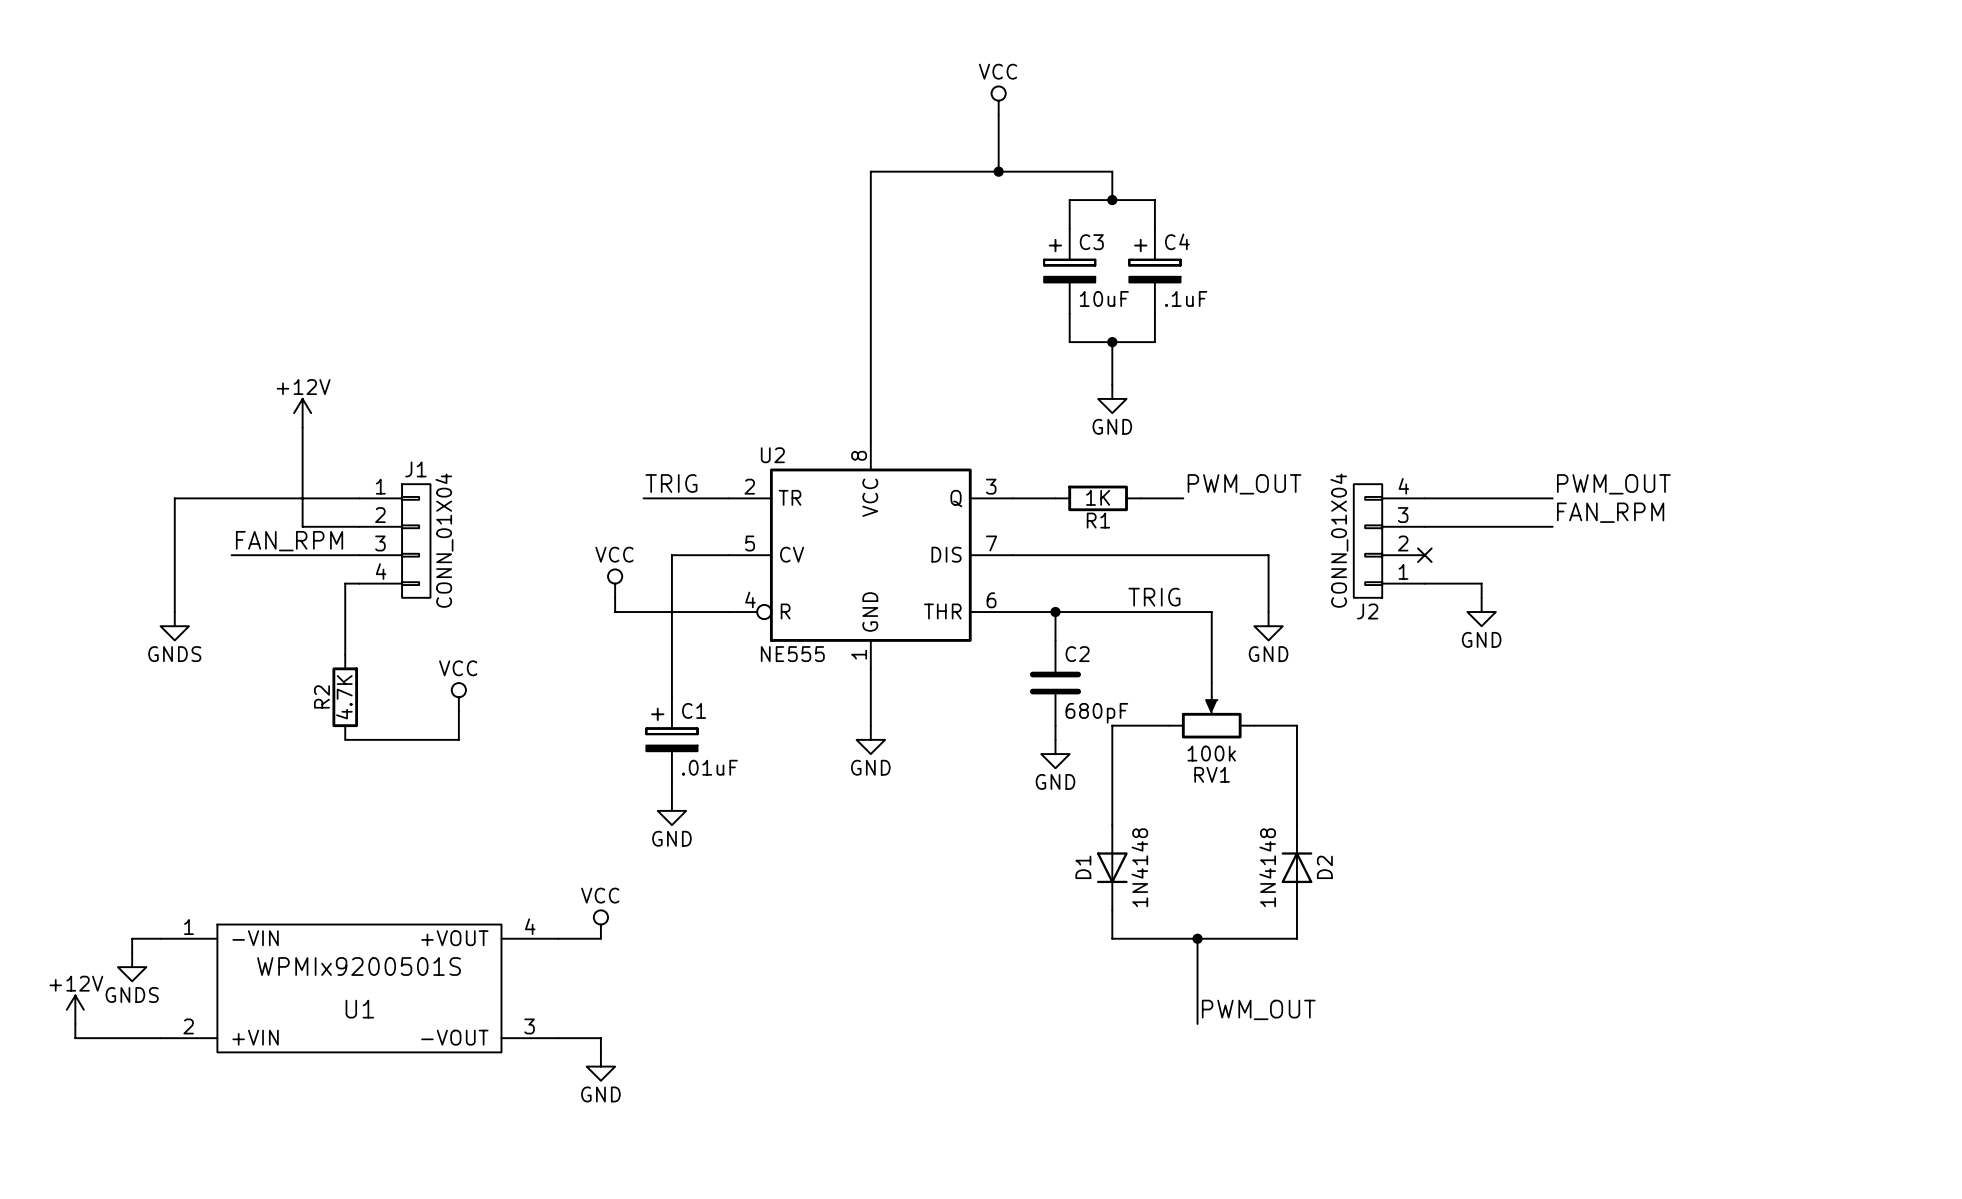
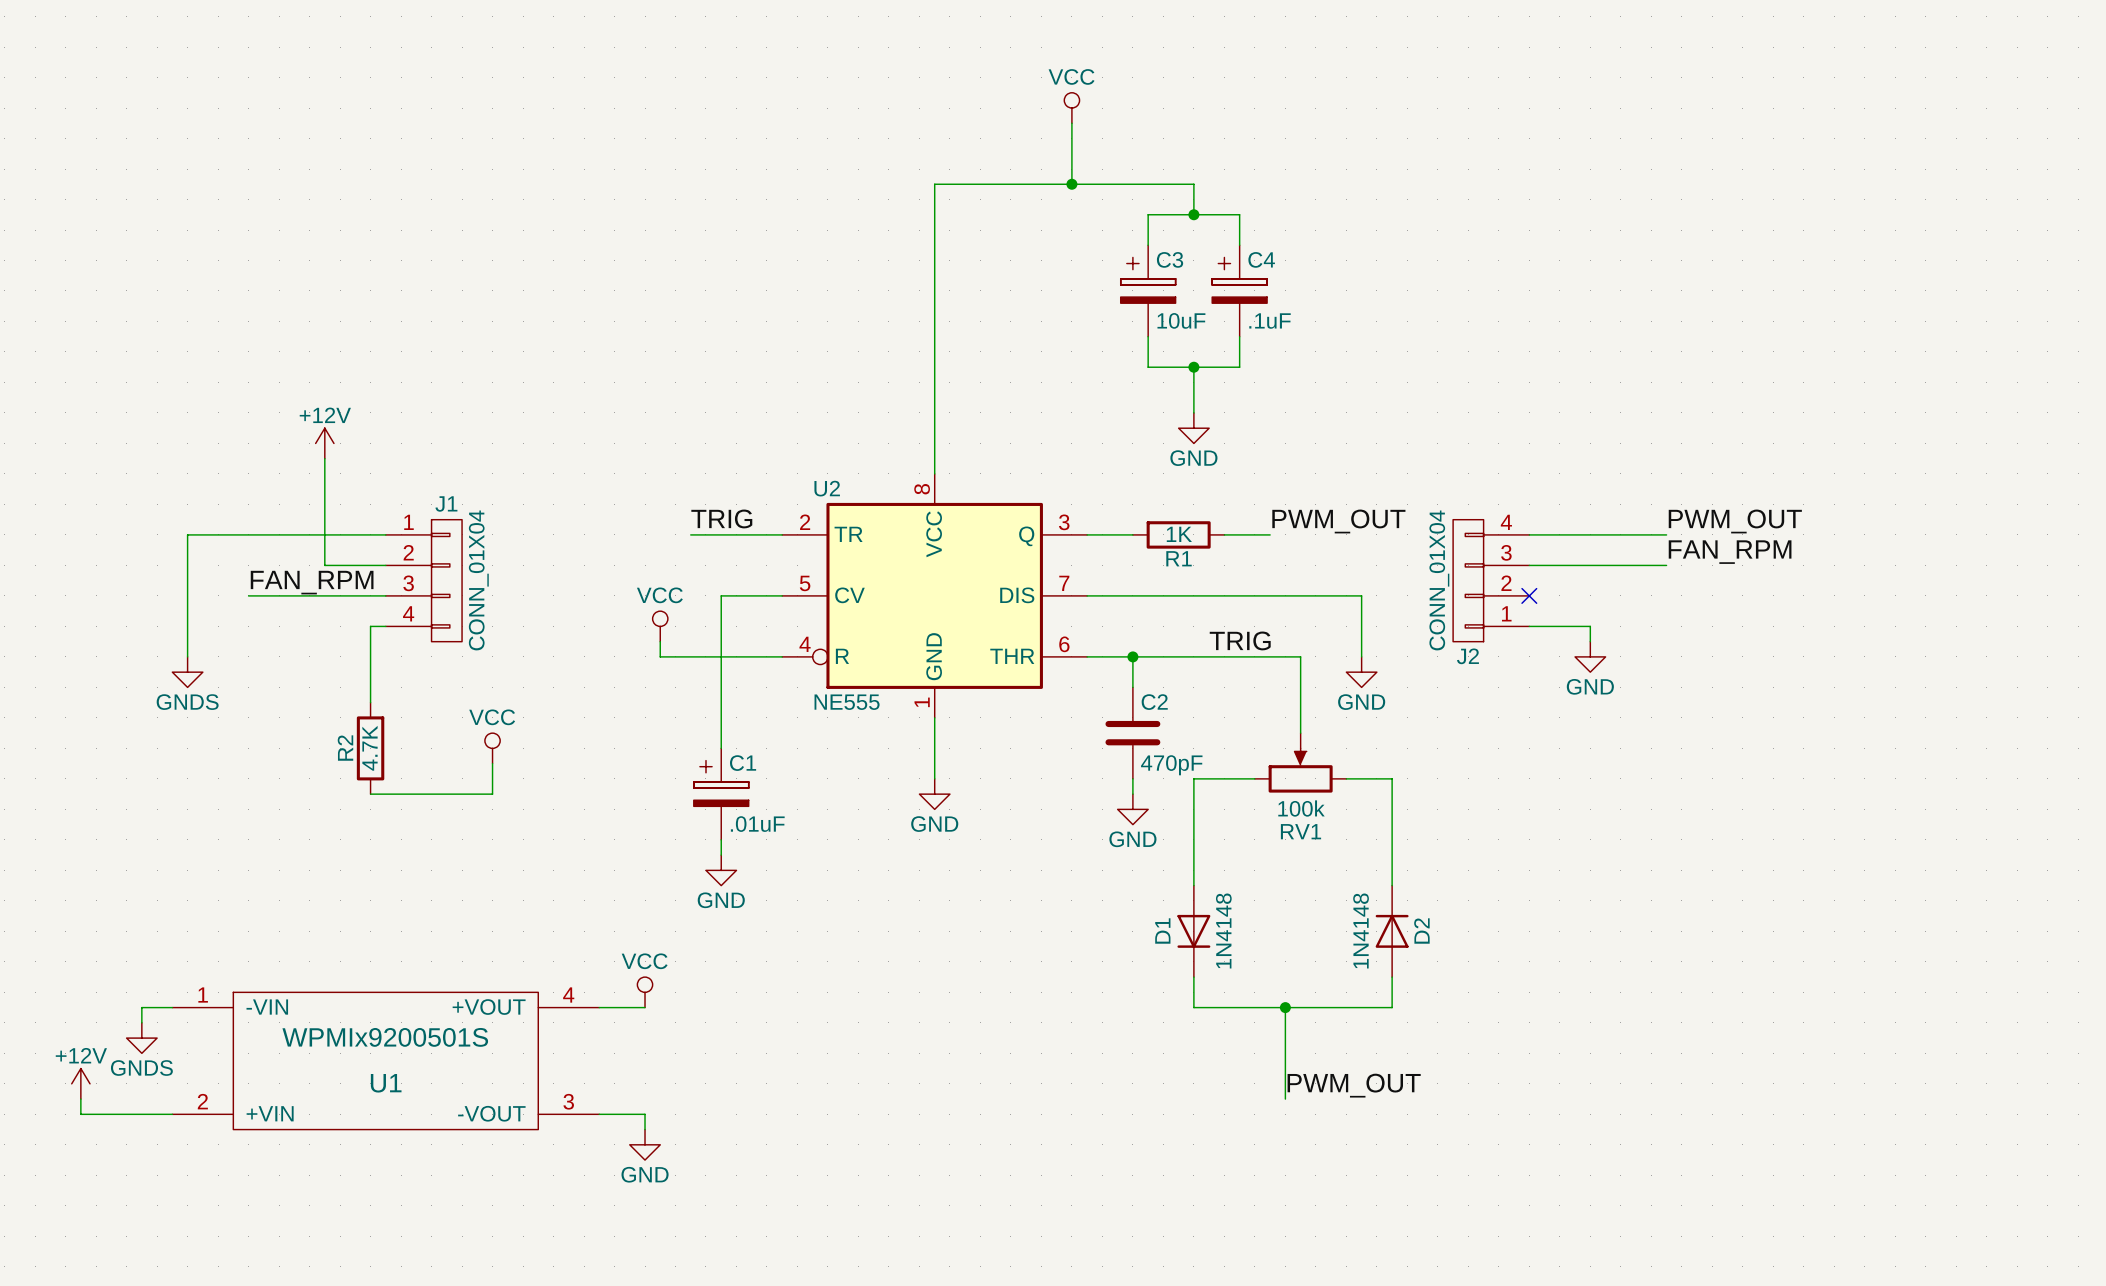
C2 value: 680pF (1096, 713) -> 470pF (1171, 765)

